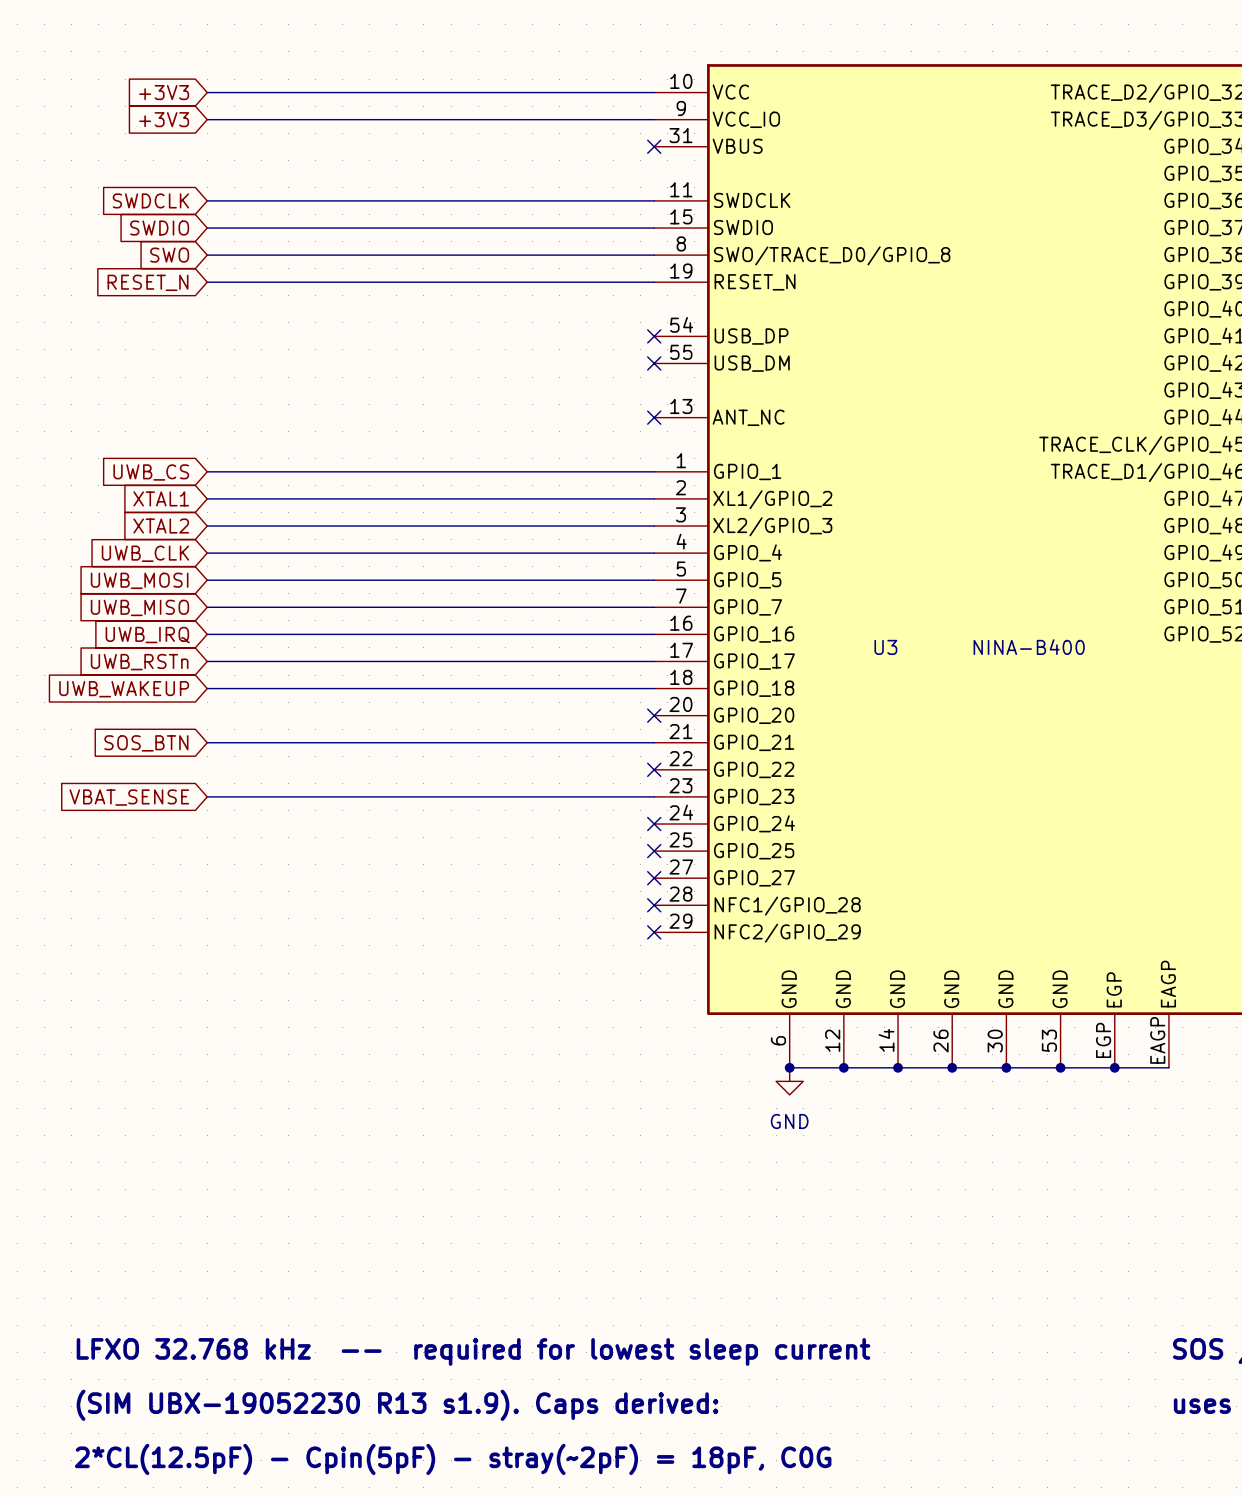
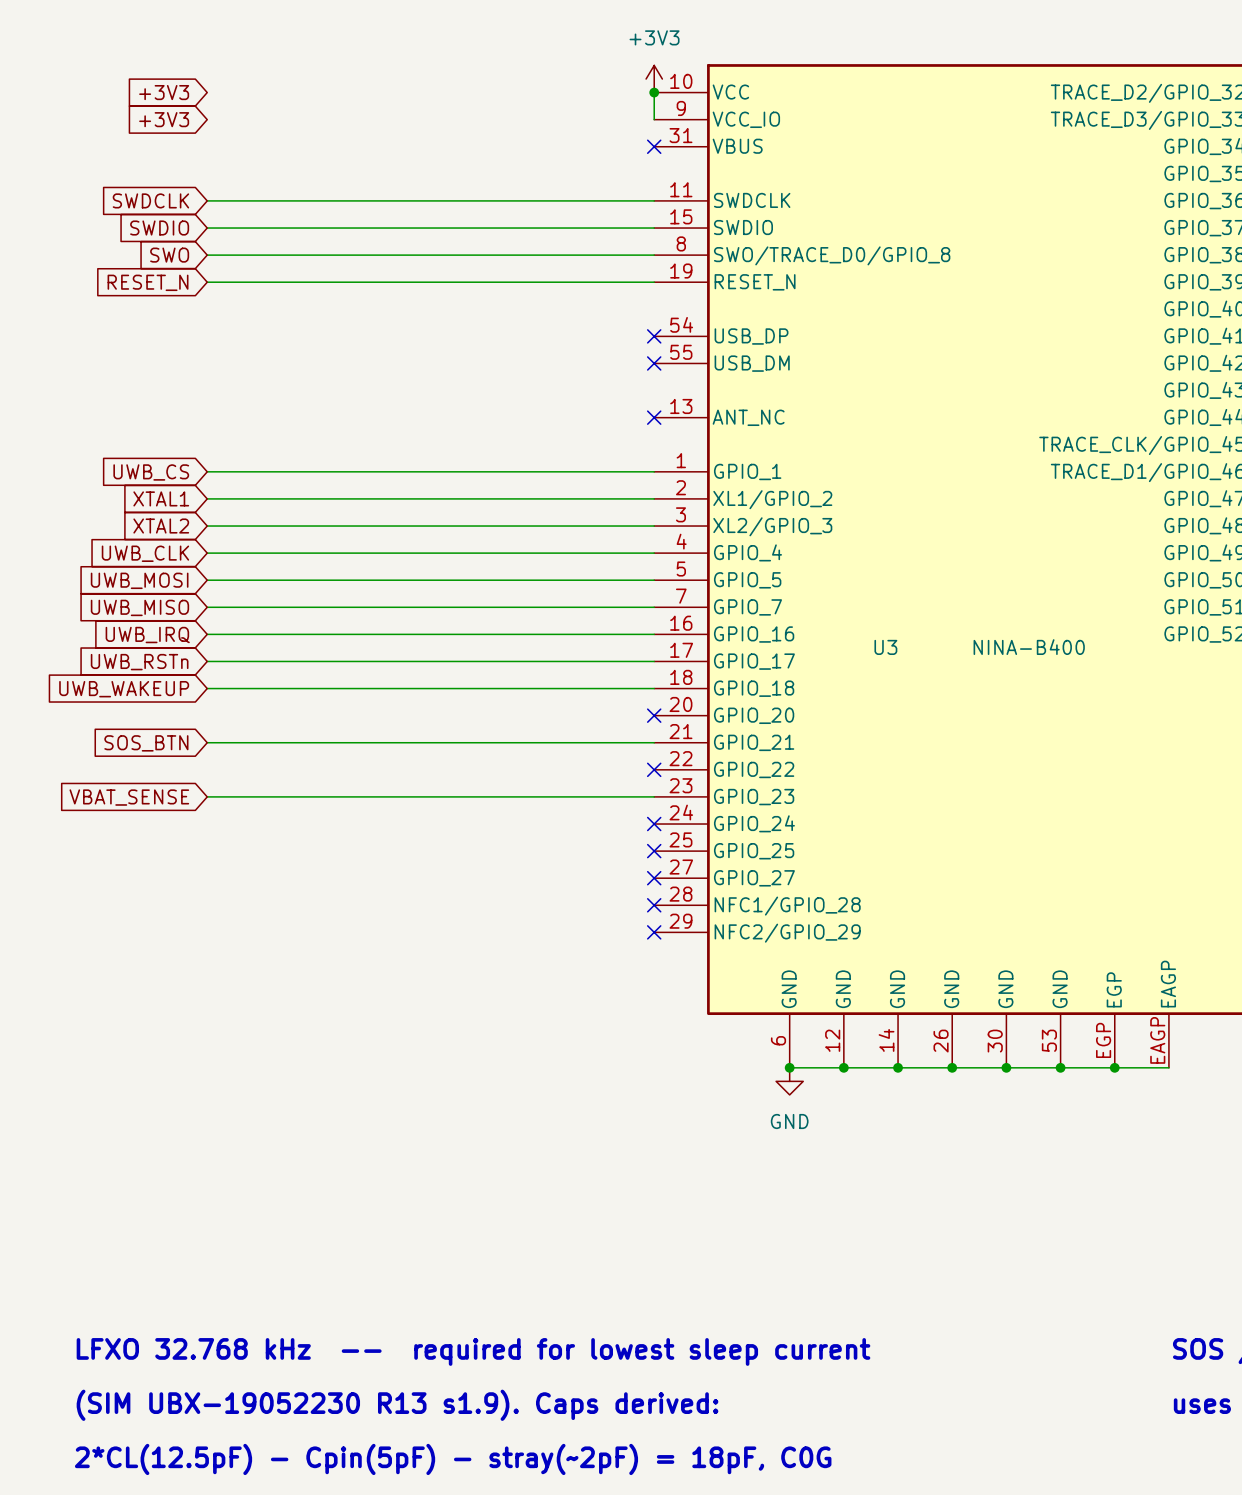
power symbol: none -> +3V3 (654, 79)
wire: (207, 92) (654, 92) -> (654, 119) (654, 92)
junction: none -> (654, 92)
wire: (207, 119) (654, 119) -> none

